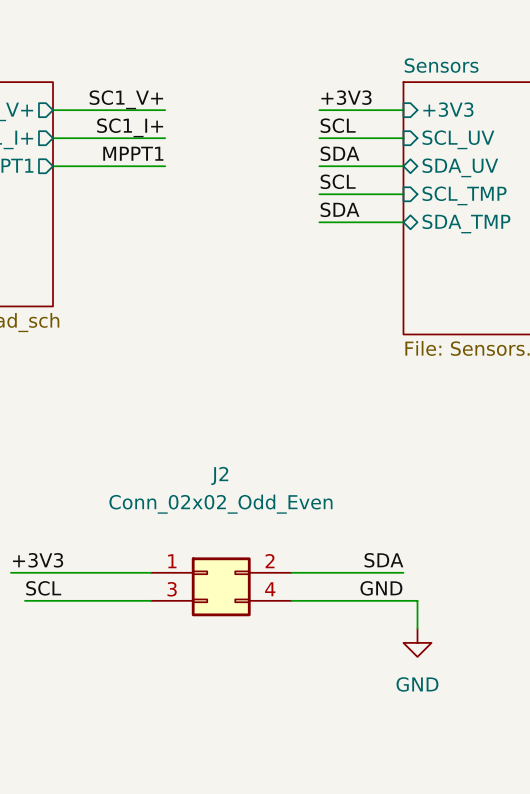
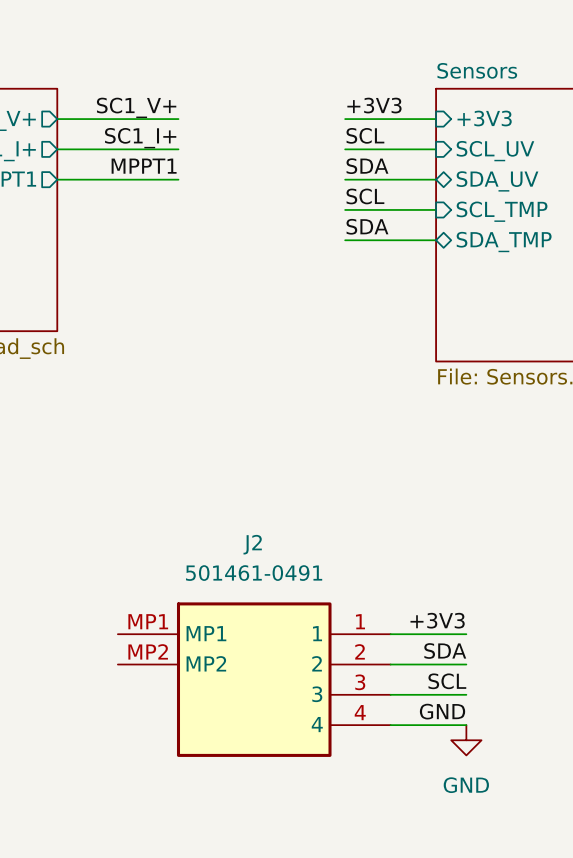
label: +3V3 (38, 560) -> none
label position: SDA (383, 560) -> SDA (445, 651)
wire: (10, 572) (151, 572) -> none
wire: (291, 572) (403, 572) -> none
label: none -> +3V3 (437, 620)
J2: Conn_02x02_Odd_Even (221, 586) -> none
wire: none -> (390, 634) (466, 634)
label: SCL (43, 588) -> none
label position: GND (381, 588) -> GND (442, 711)
wire: (24, 600) (151, 600) -> none
wire: (291, 600) (417, 600) (417, 628) -> none
wire: none -> (390, 664) (466, 664)
part: none -> (254, 679)
label: none -> SCL (447, 681)
wire: none -> (390, 694) (466, 694)
power symbol position: GND (417, 642) -> GND (466, 740)
wire: none -> (390, 725) (466, 725)

